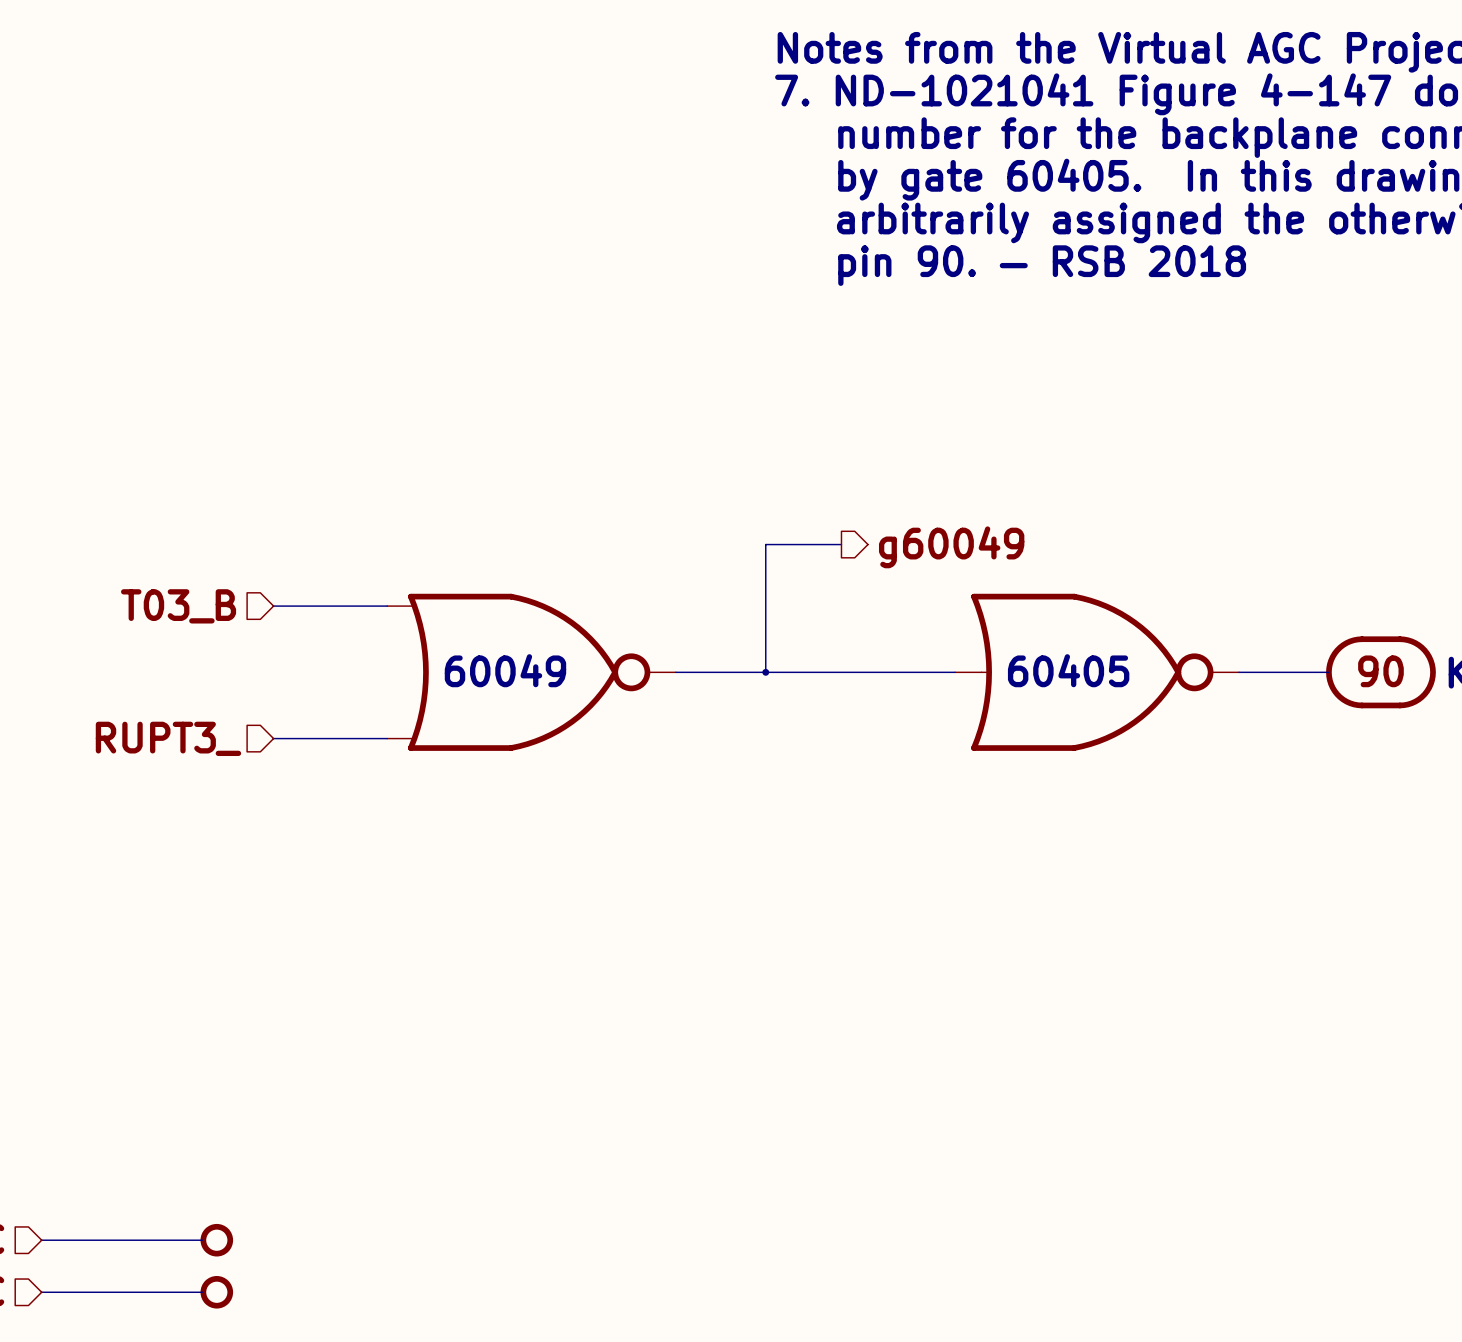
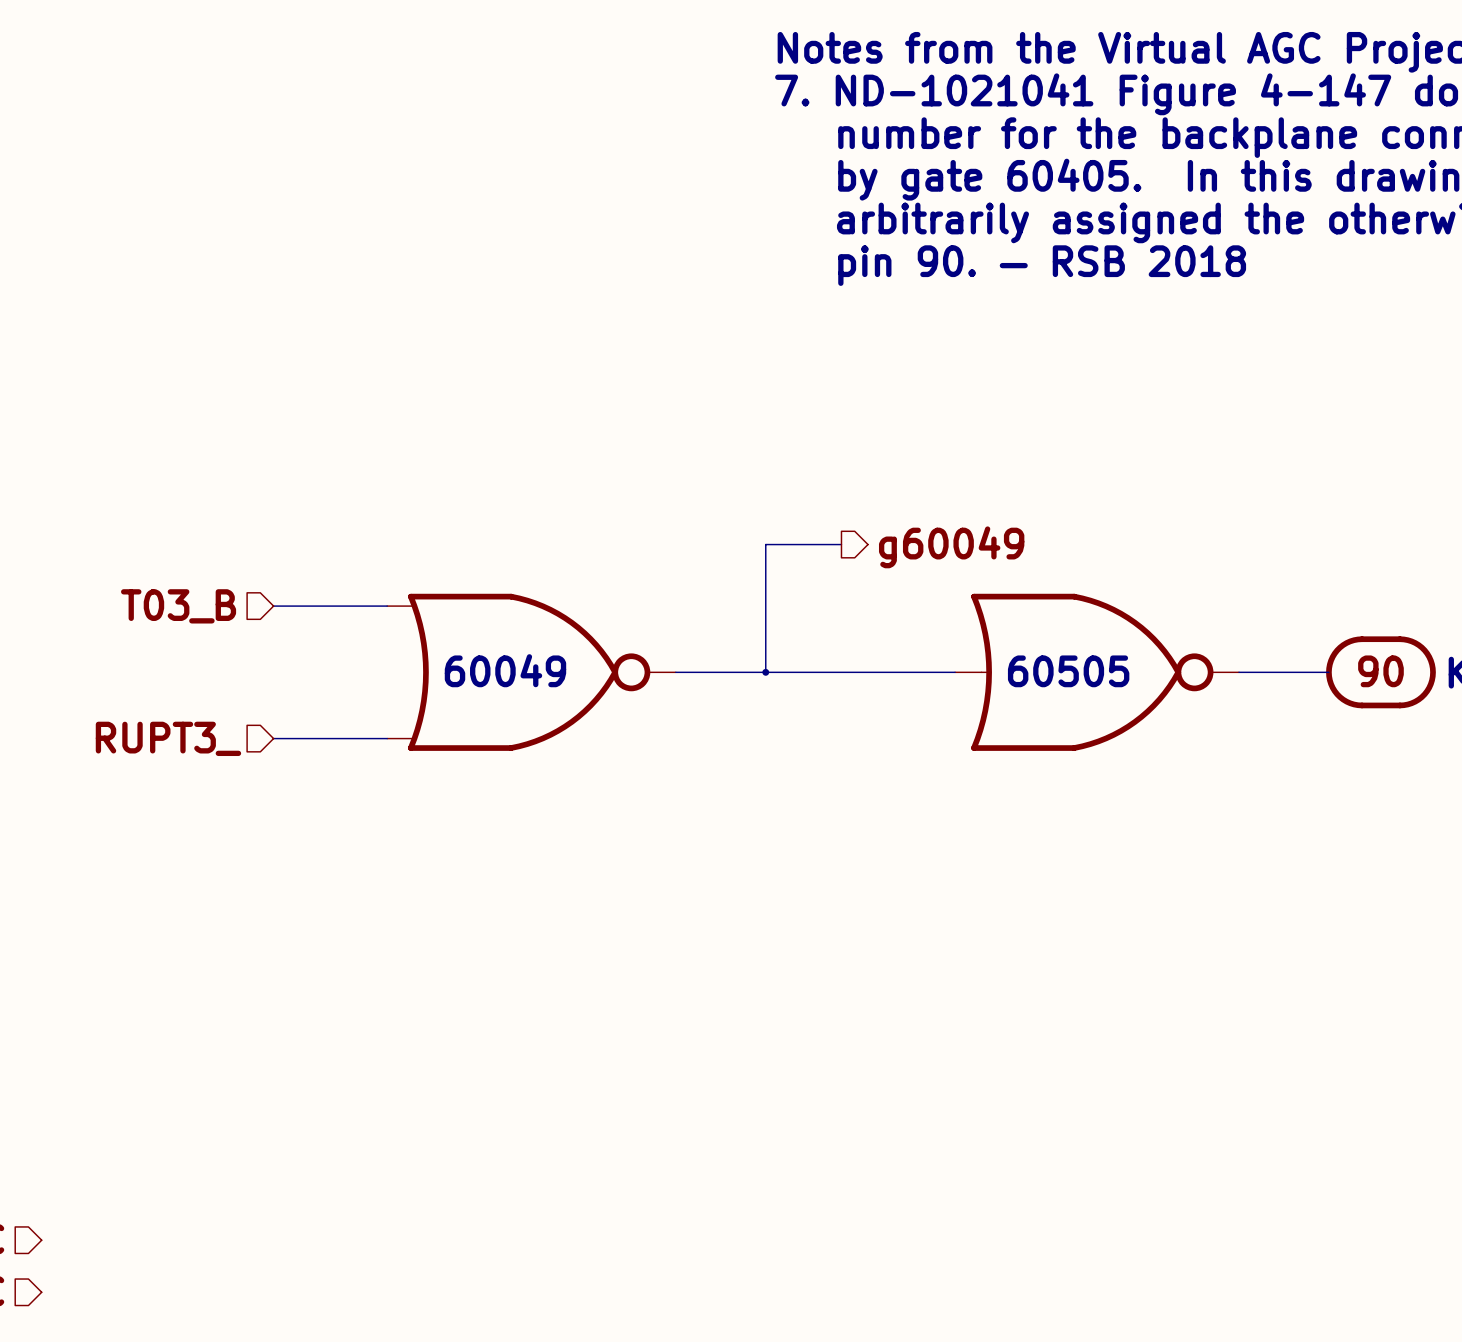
part text: 60405 (1068, 670) -> 60505 (1068, 671)
wire: (41, 1240) (202, 1240) -> none
part: (216, 1240) -> none
wire: (41, 1292) (202, 1292) -> none
part: (216, 1292) -> none

